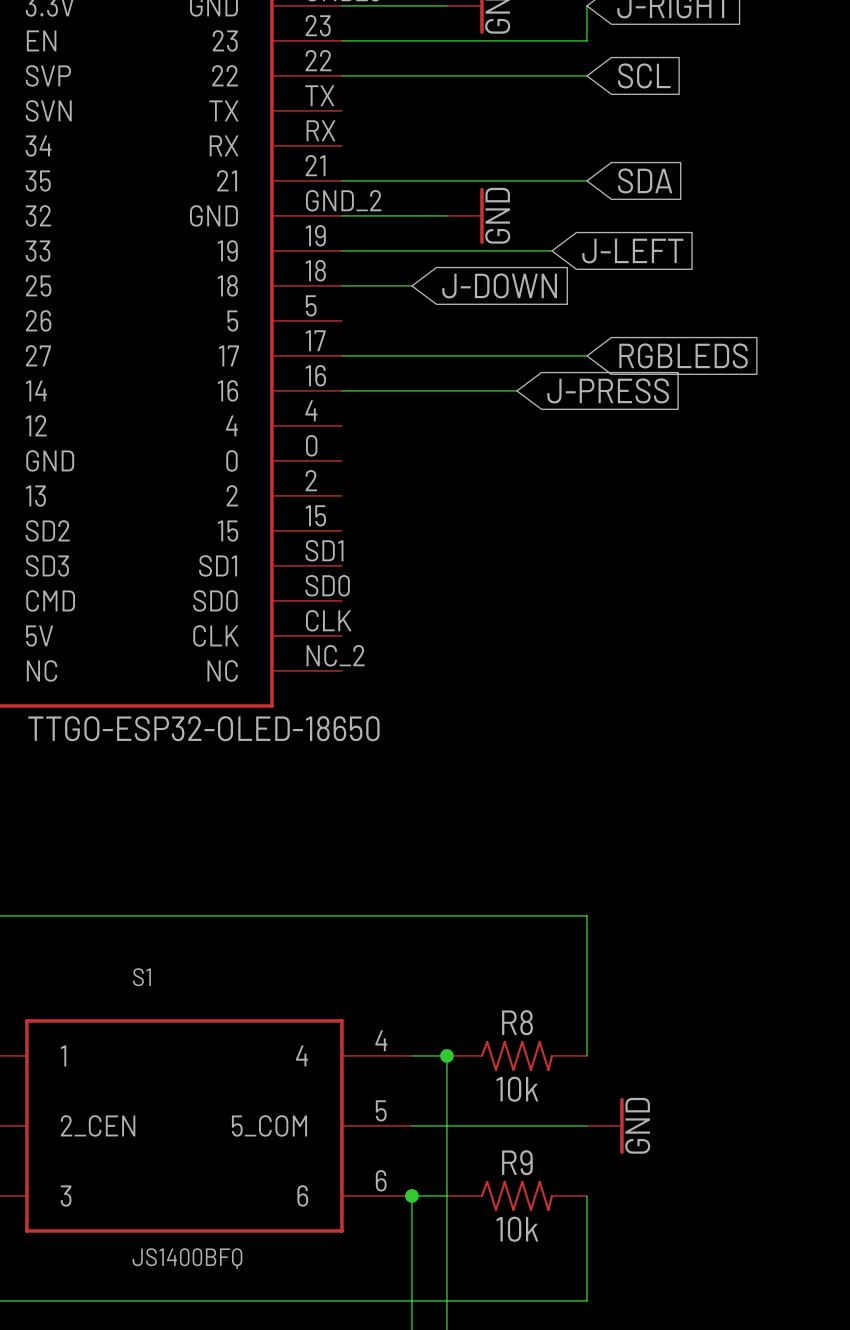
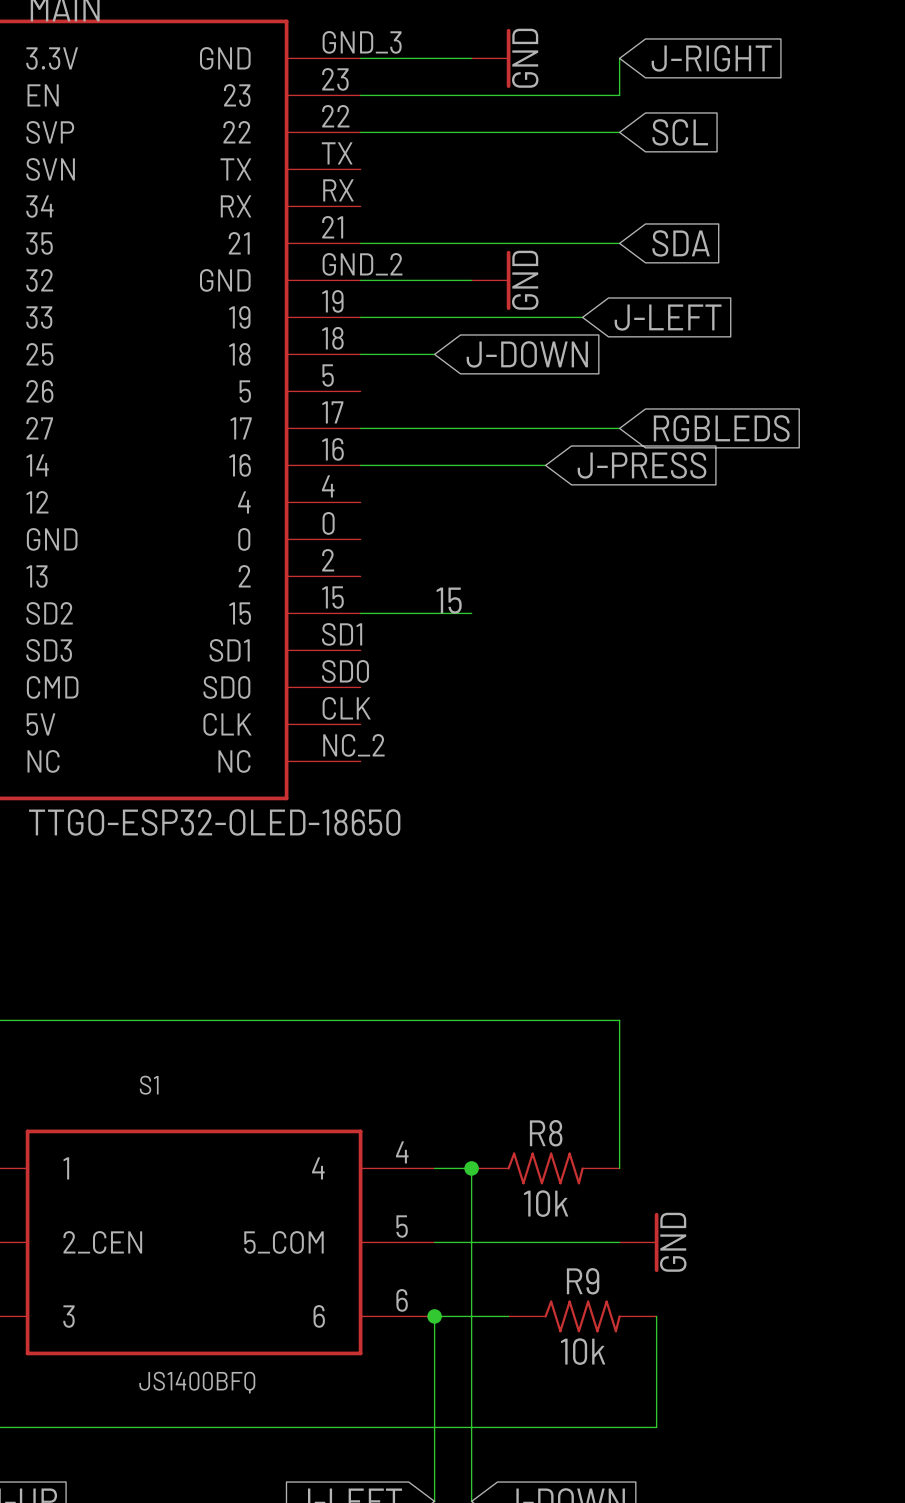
label: none -> 15 (449, 600)
wire: none -> (360, 613) (471, 613)
R9 position: (516, 1195) -> (582, 1316)
wire: (586, 1195) (586, 1300) -> (656, 1316) (656, 1427) (619, 1427)

